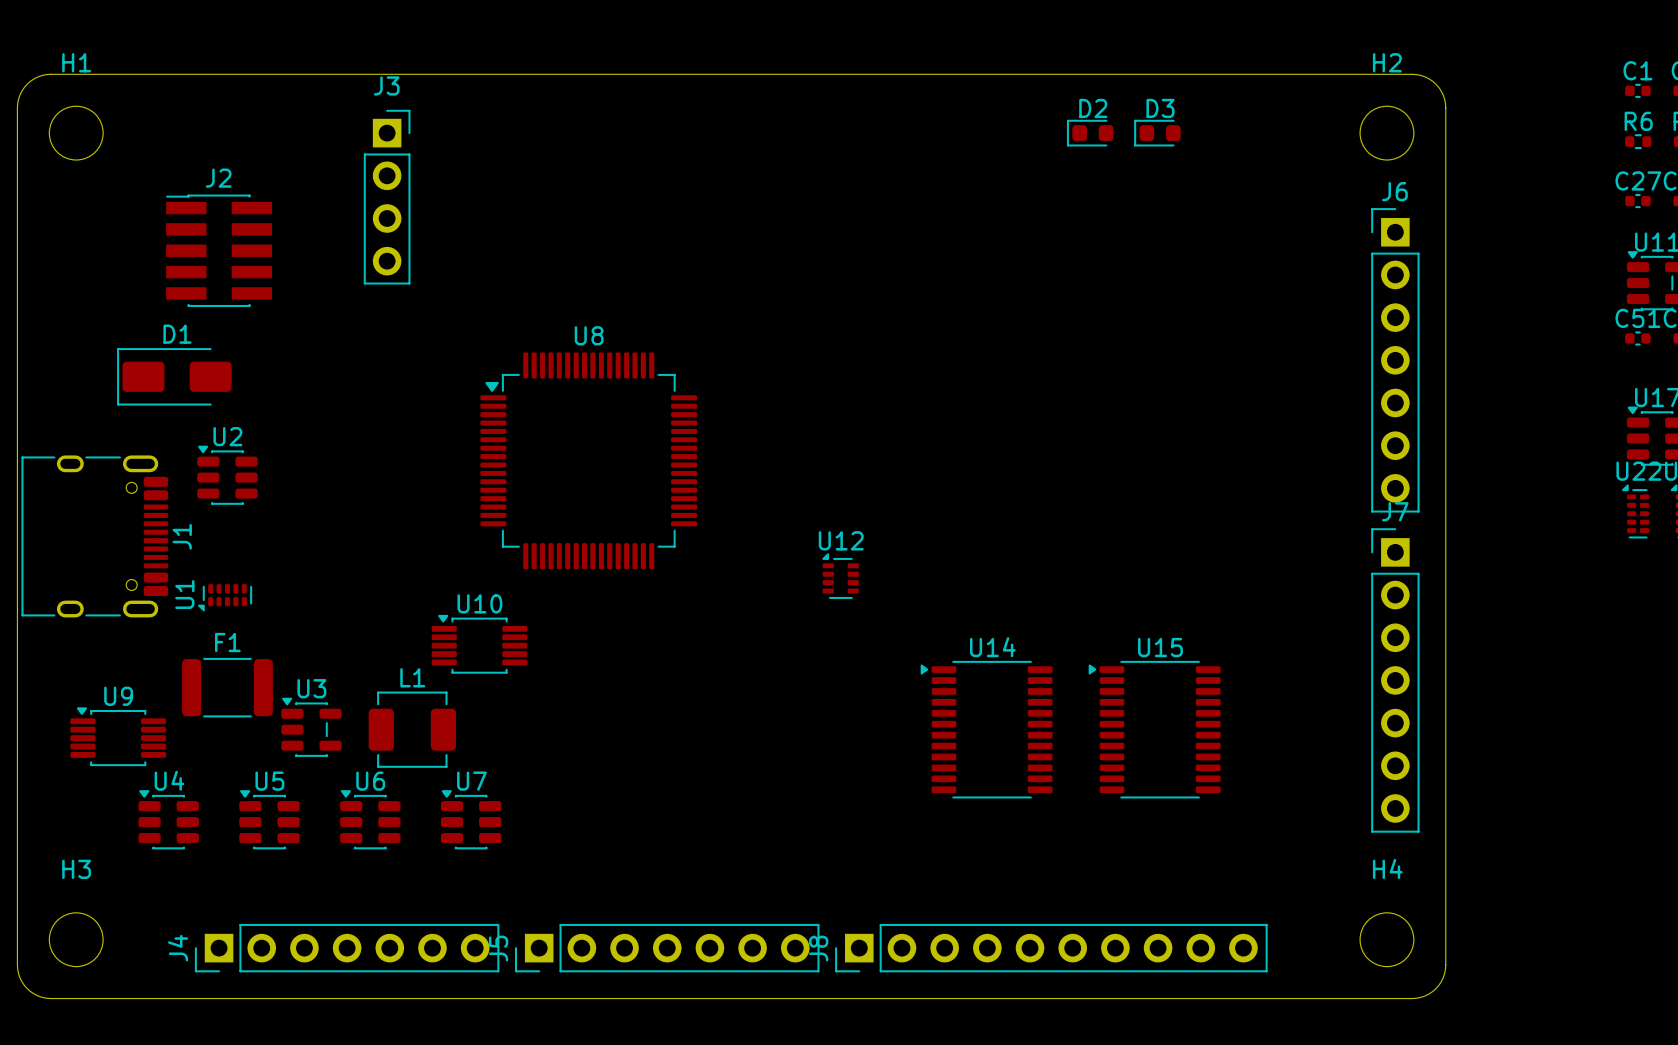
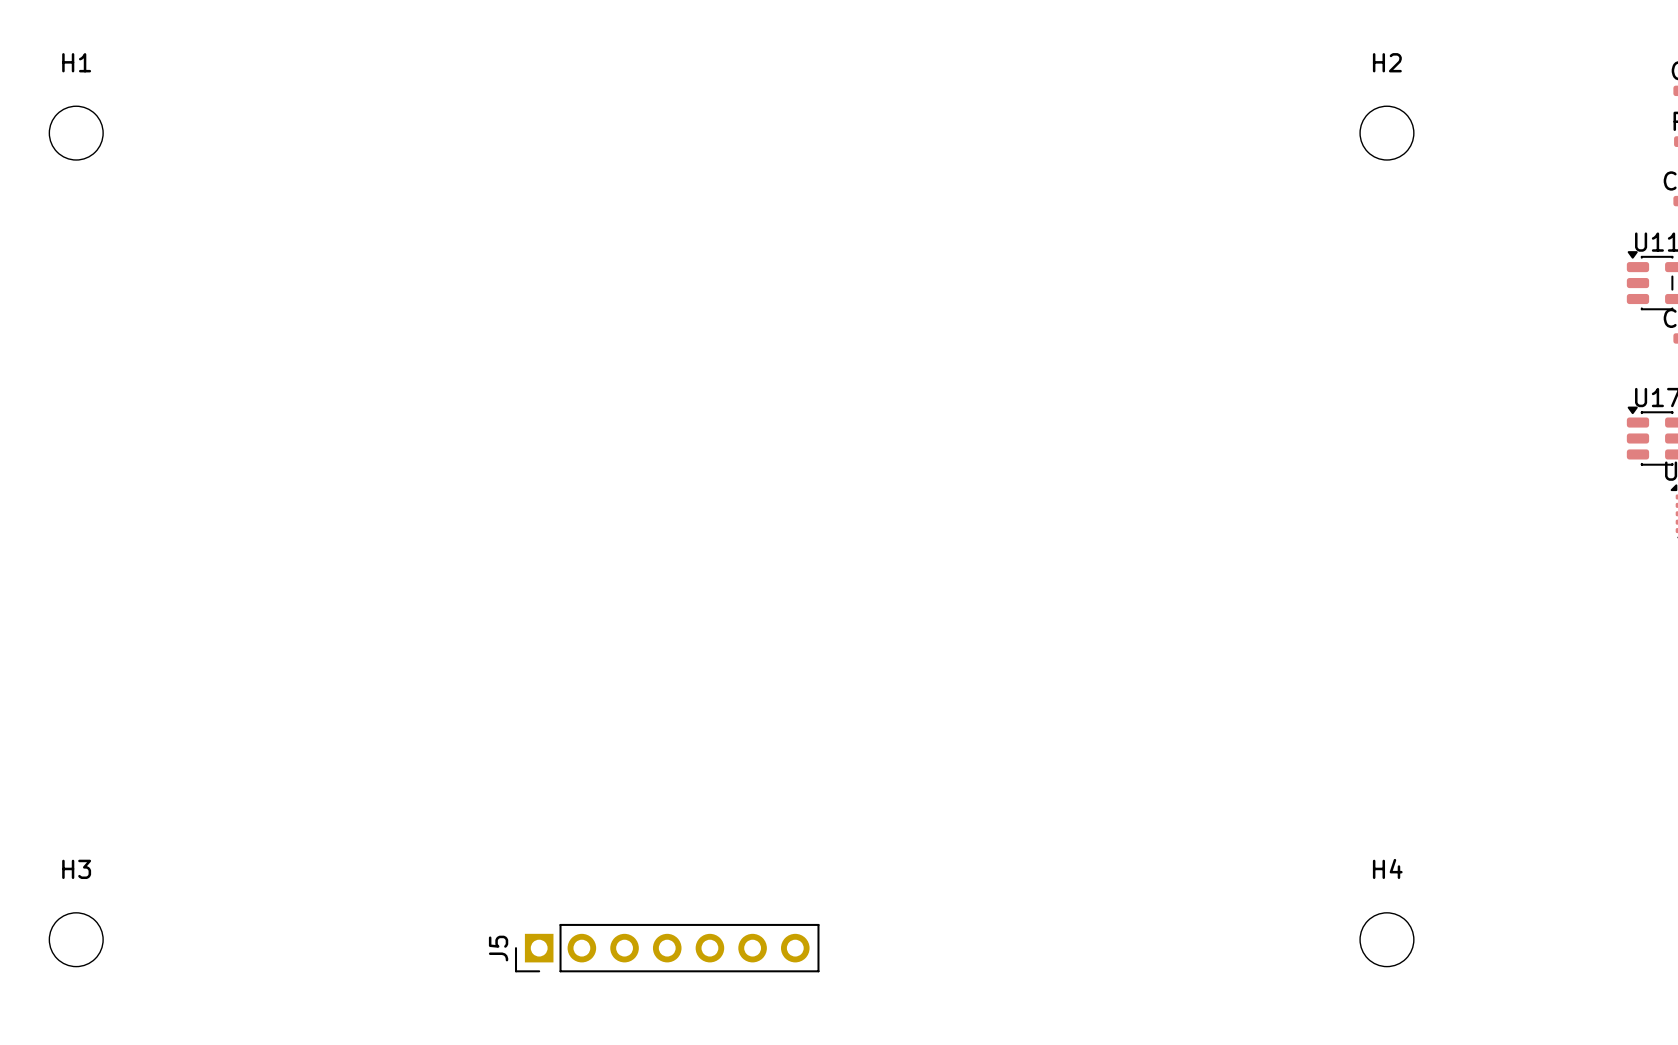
board edge: (51, 74) (1412, 74) (1428, 78) (1441, 91) (1445, 107) (1445, 964) (1441, 981) (1428, 994) (1412, 998) (51, 998) (34, 994) (21, 981) (17, 964) (17, 107) (20, 93) (27, 84) (36, 77) (51, 74) -> none
C1: (1637, 90) -> none
D2: (1090, 133) -> none
D3: (1157, 133) -> none
R6: (1638, 141) -> none
J3: (387, 197) -> none
C27: (1637, 201) -> none
J2: (219, 250) -> none
C51: (1637, 338) -> none
J6: (1395, 360) -> none
D1: (174, 376) -> none
U8: (588, 460) -> none
U2: (227, 475) -> none
U22: (1635, 511) -> none
J1: (94, 536) -> none
U12: (840, 576) -> none
U1: (225, 597) -> none
U10: (479, 644) -> none
J7: (1395, 680) -> none
F1: (227, 687) -> none
U3: (311, 727) -> none
L1: (412, 729) -> none
U14: (986, 729) -> none
U15: (1154, 729) -> none
U9: (118, 736) -> none
U4: (168, 819) -> none
U5: (269, 819) -> none
U6: (370, 819) -> none
U7: (471, 819) -> none
J4: (347, 948) -> none
J8: (1051, 948) -> none

